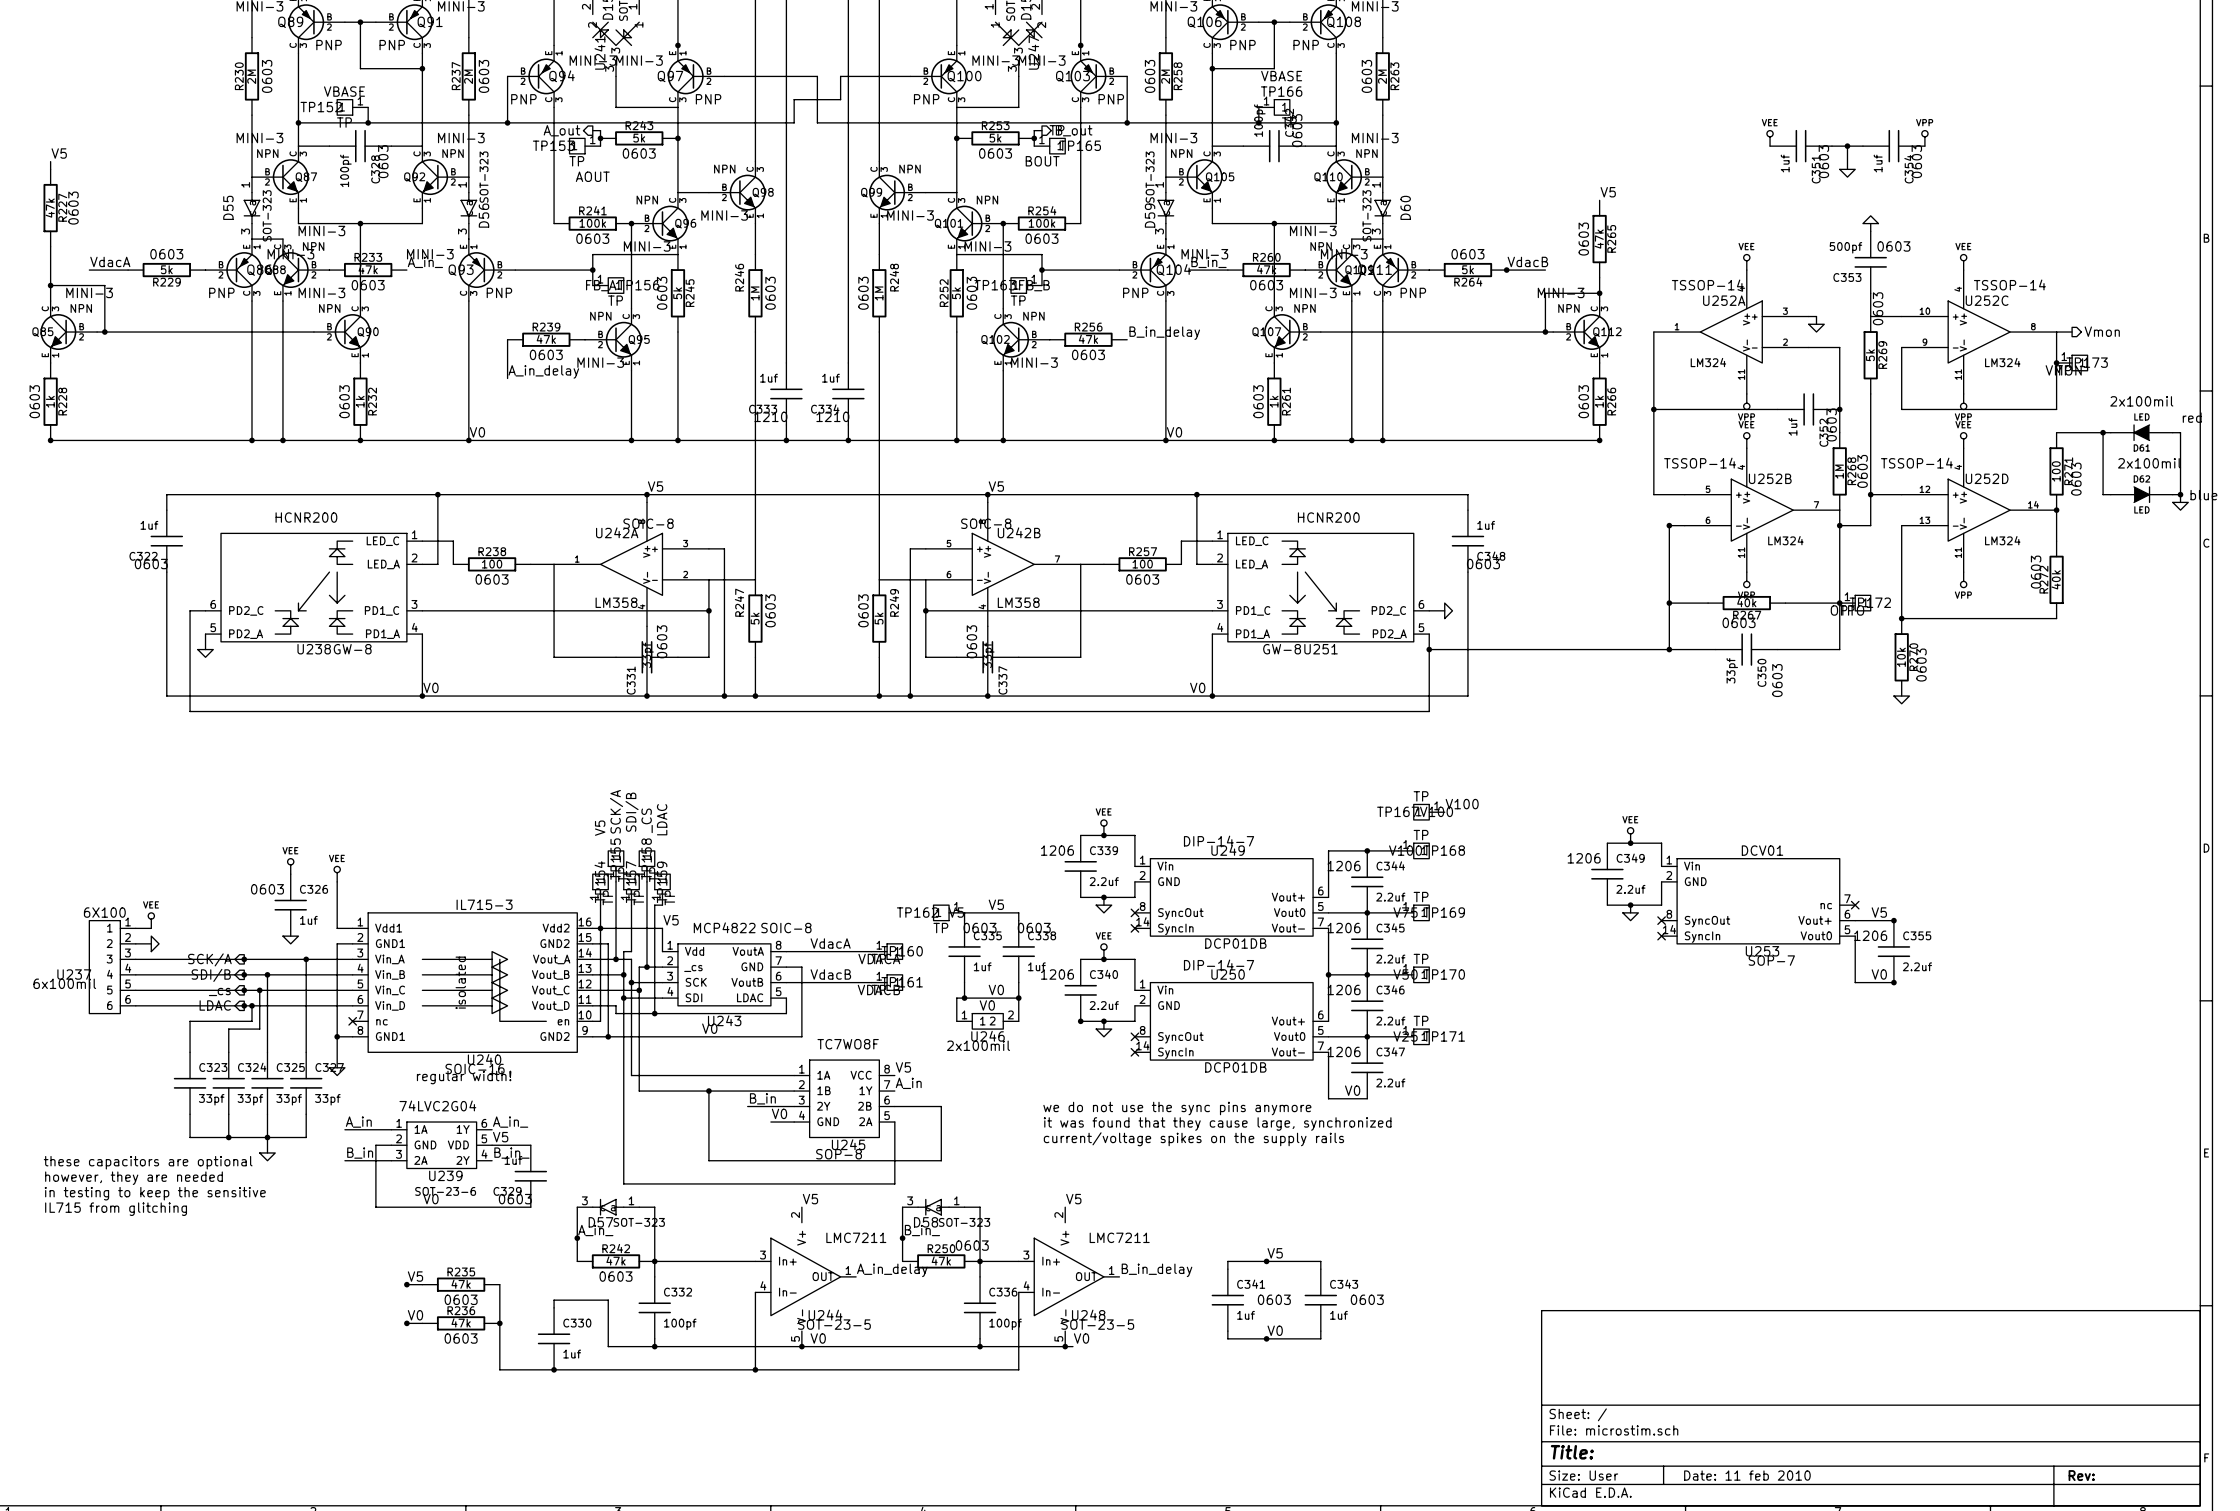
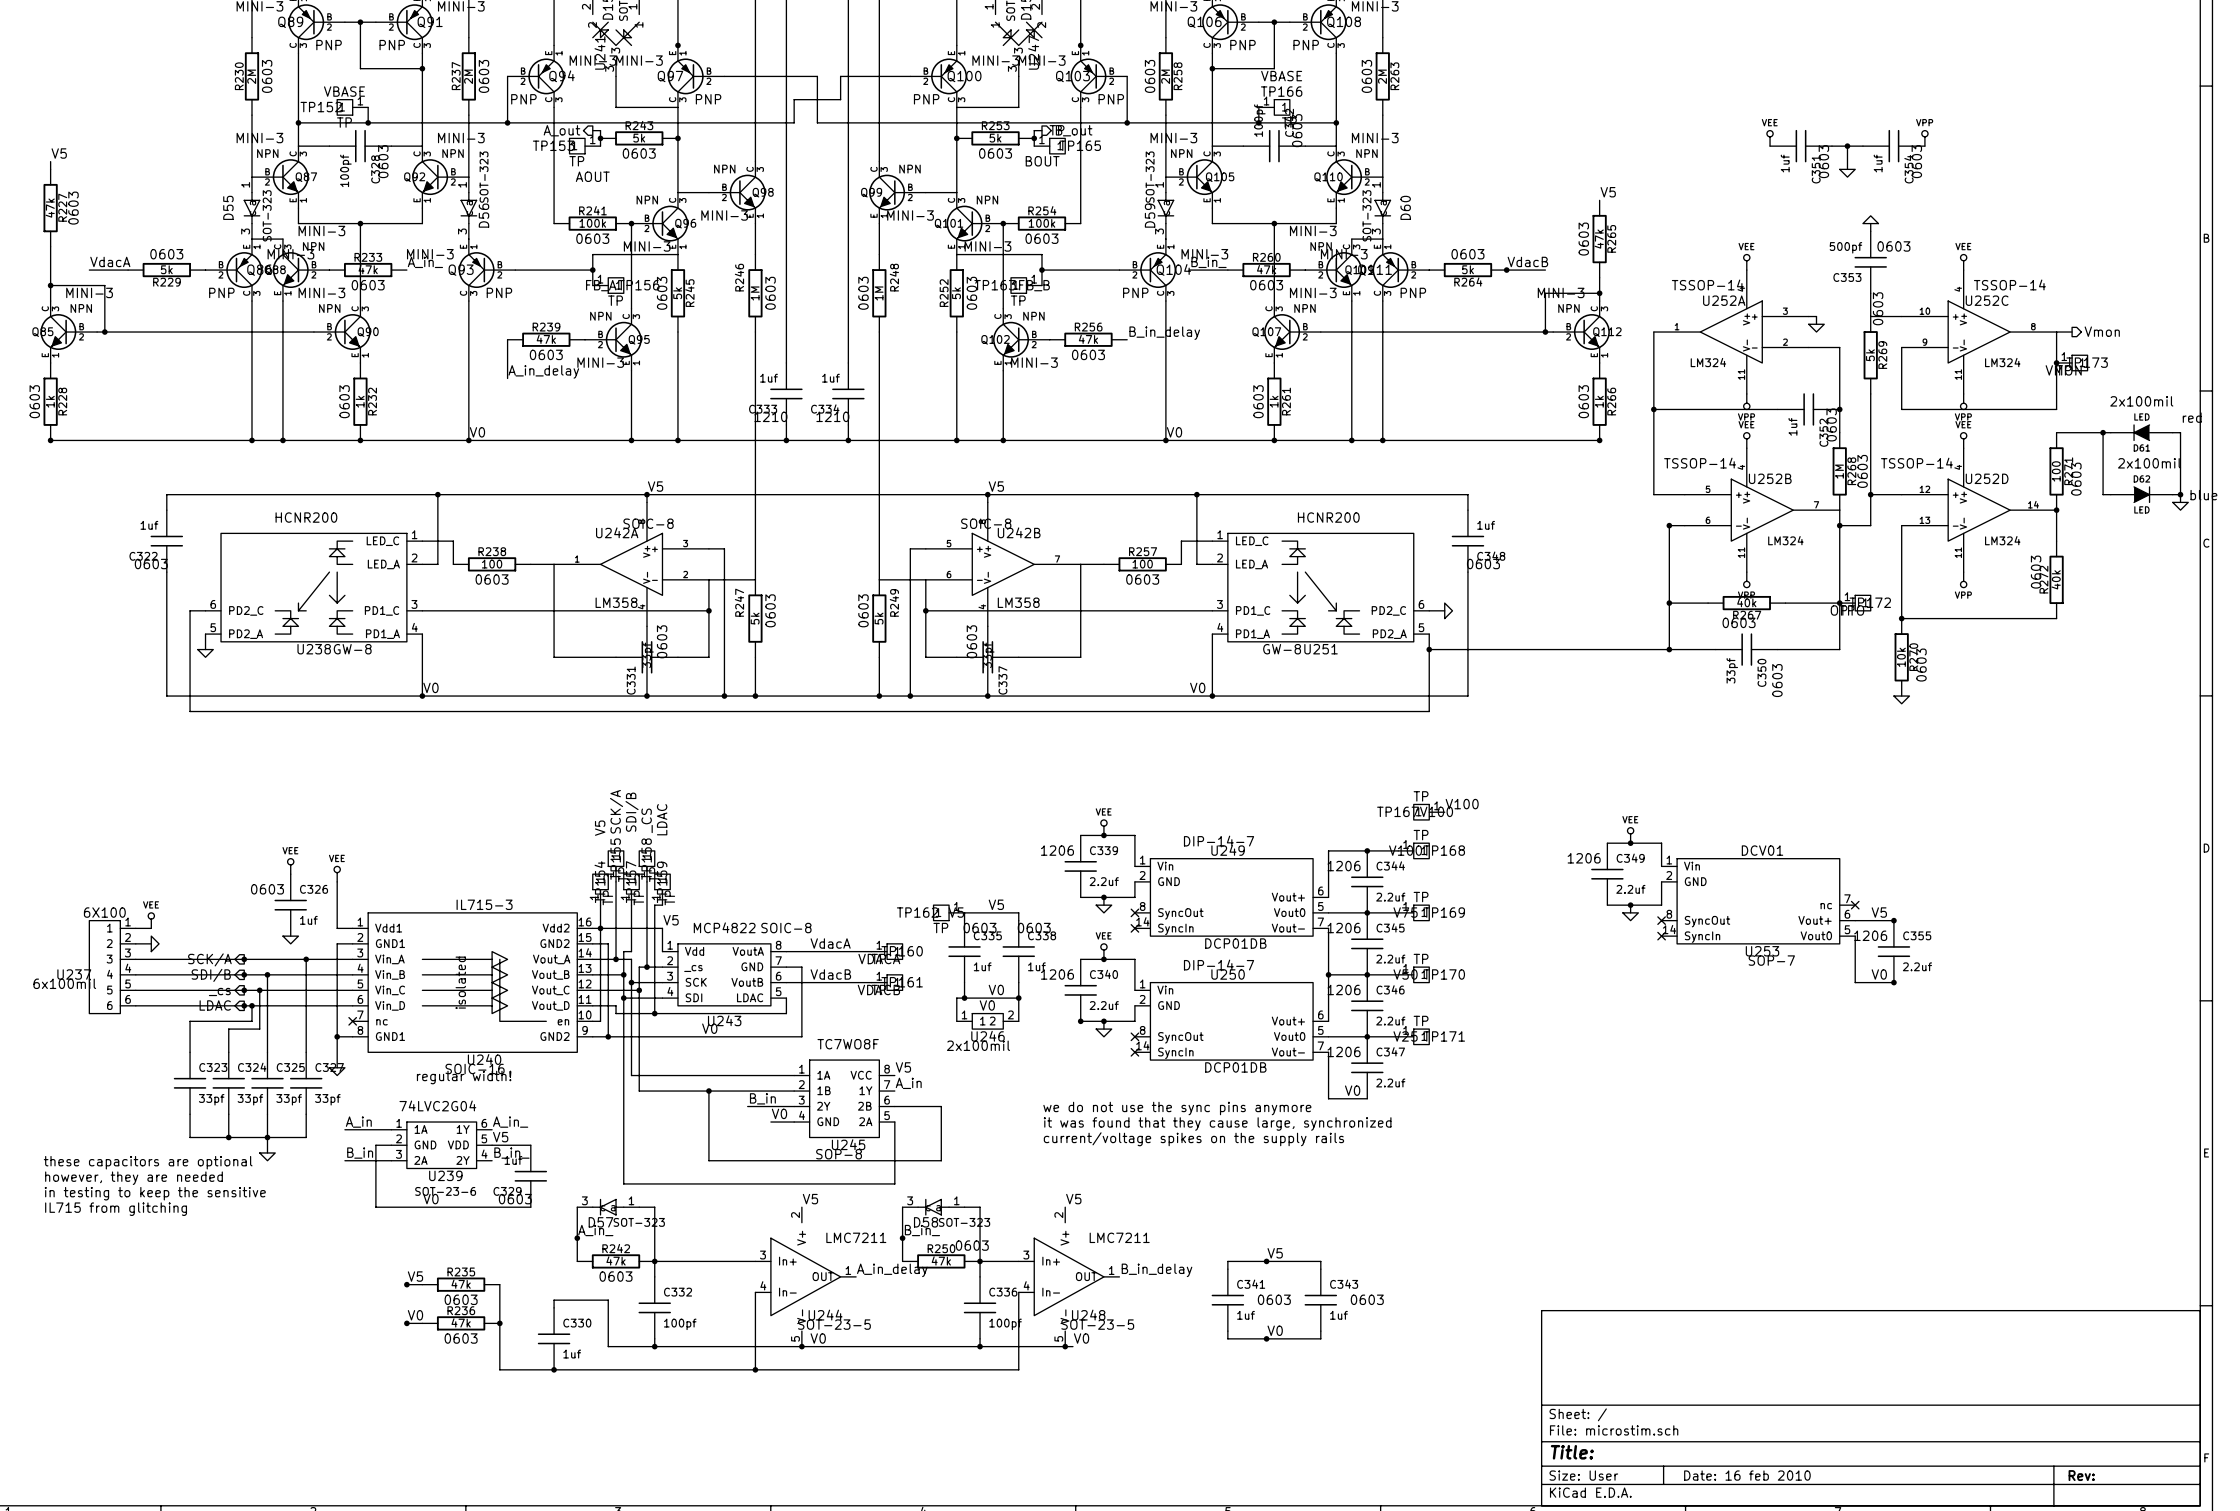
title block: Date: 11 feb 2010 (1747, 1475) -> Date: 16 feb 2010 (1747, 1475)

